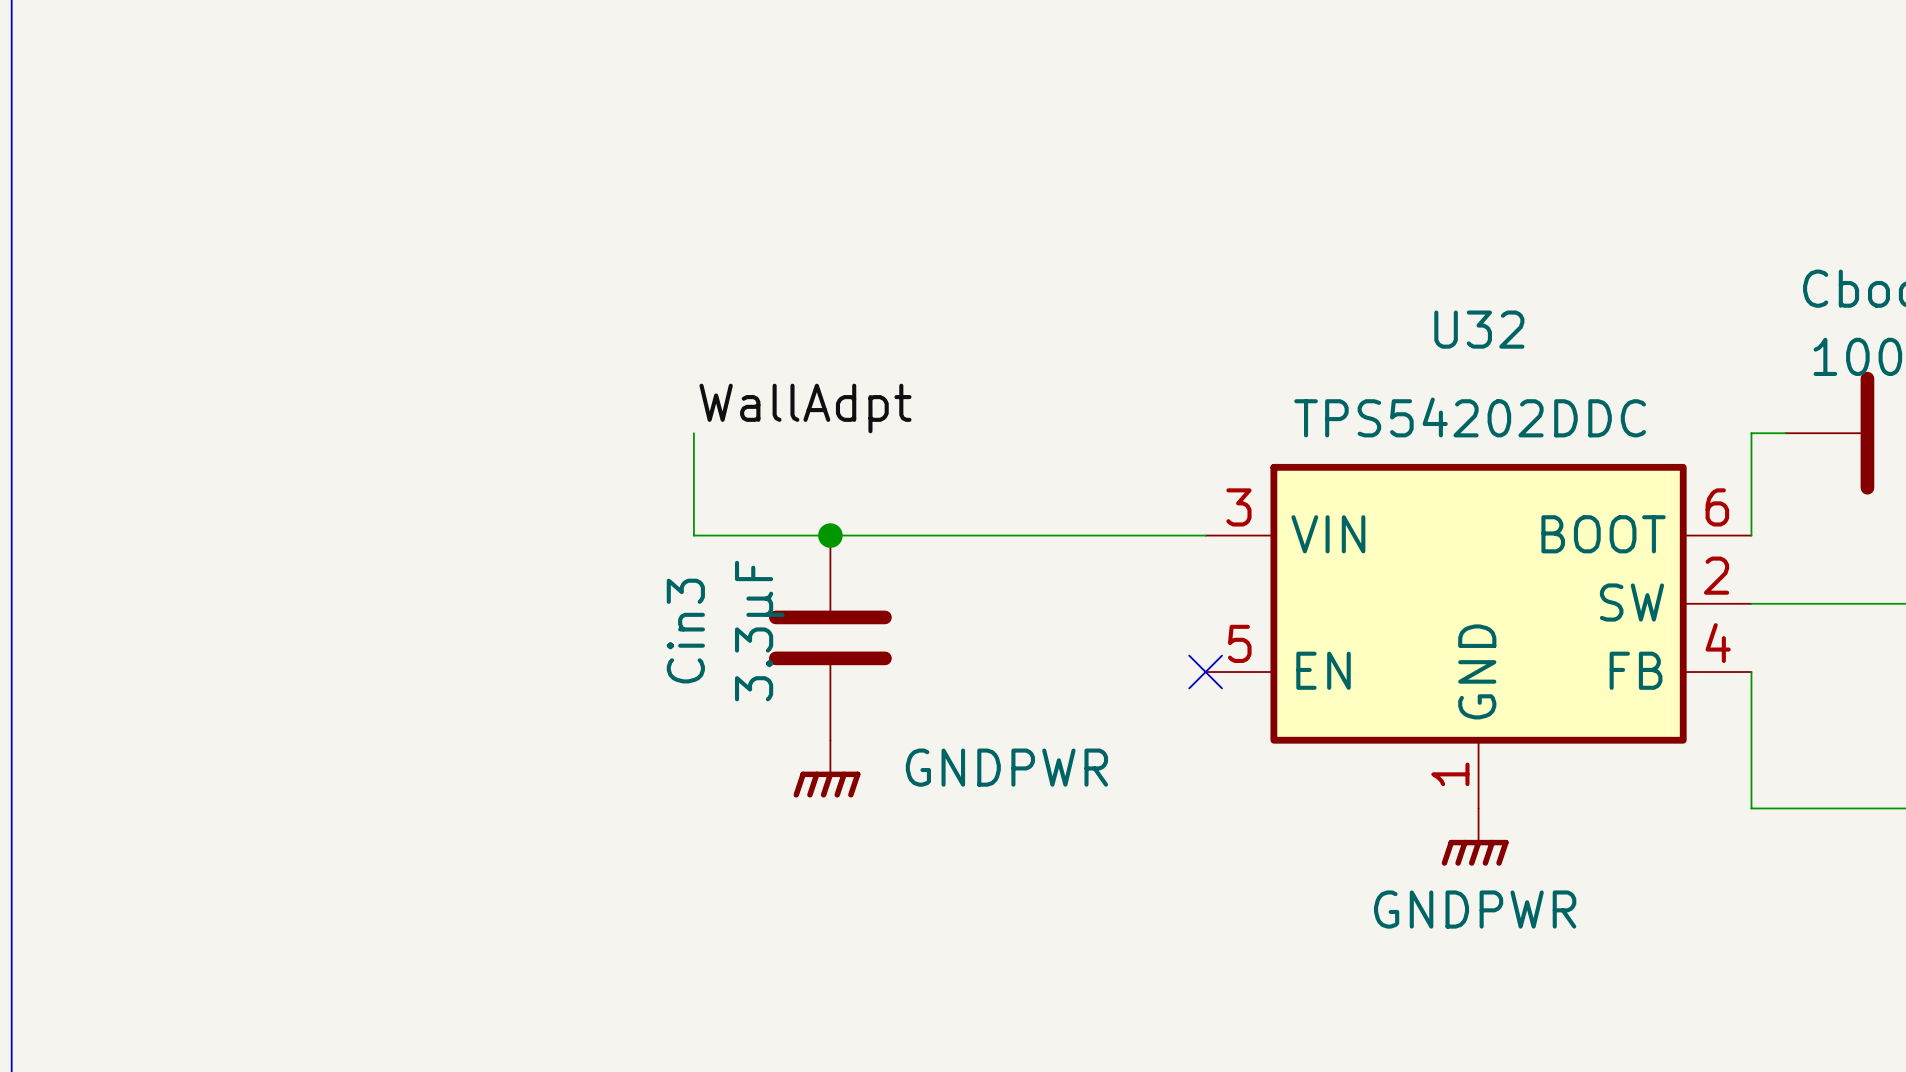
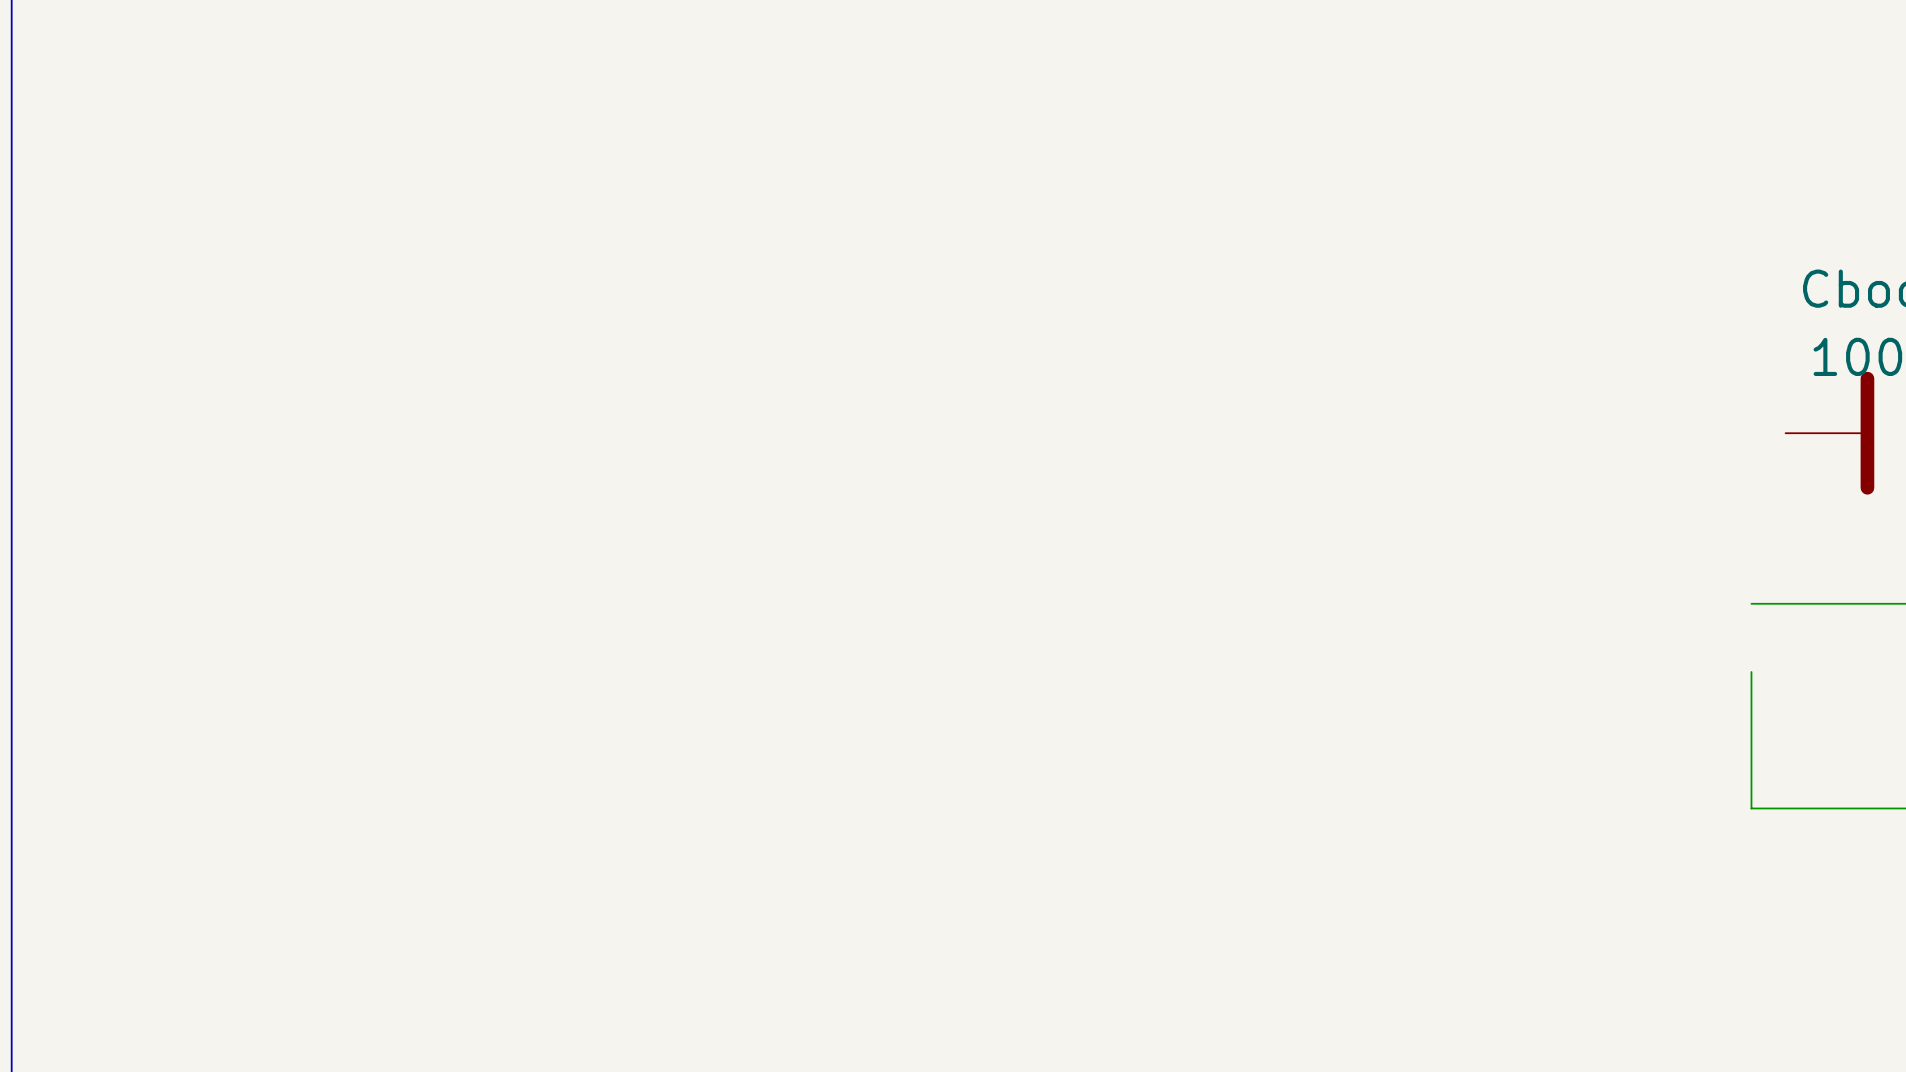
label: WallAdpt (805, 408) -> none
wire: (693, 433) (693, 535) (1205, 535) -> none
wire: (1785, 433) (1751, 433) (1751, 535) -> none
junction: (830, 535) -> none
U32: TPS54202DDC (1478, 636) -> none
Cin3: 3.3µF (830, 637) -> none
no-connect mark: (1205, 672) -> none
power symbol: GNDPWR (826, 768) -> none
power symbol: GNDPWR (1475, 837) -> none

